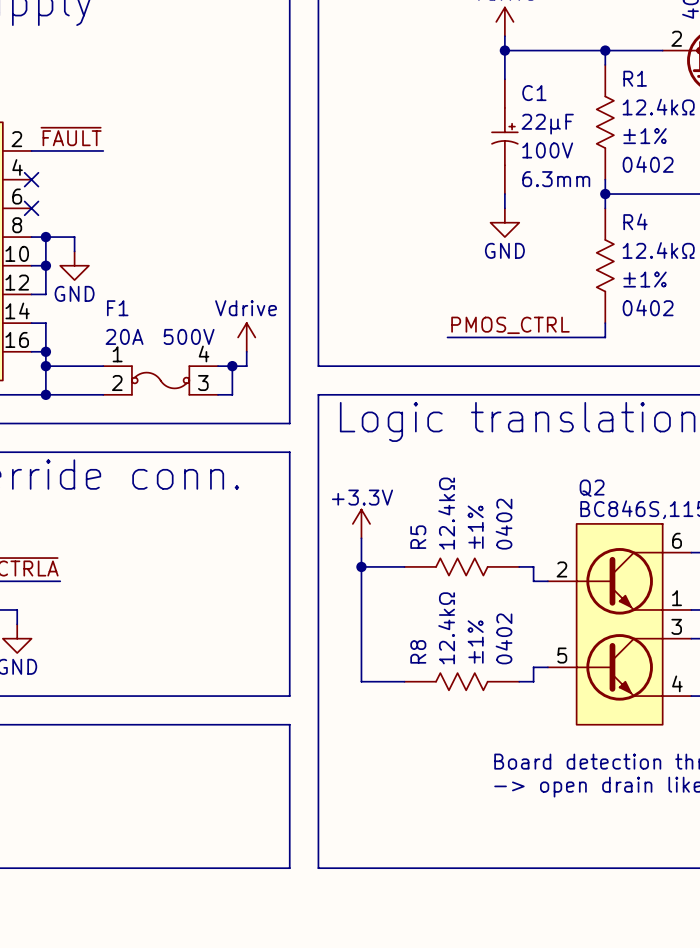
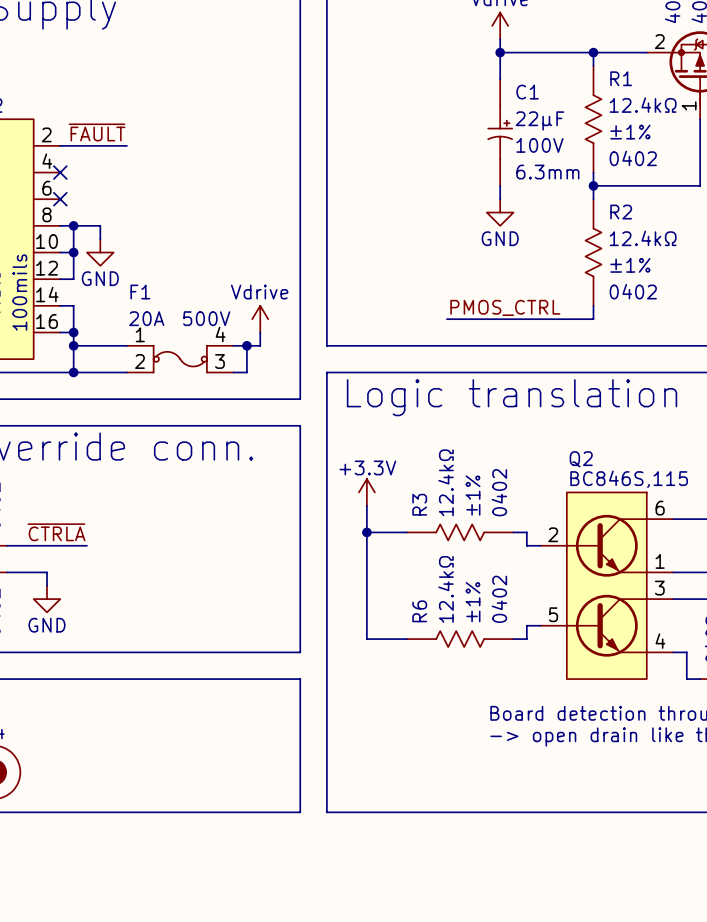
R4 name: R4 (635, 221) -> R2 (621, 212)
R5 name: R5 (418, 537) -> R3 (419, 504)
R8 name: R8 (418, 651) -> R6 (419, 611)

